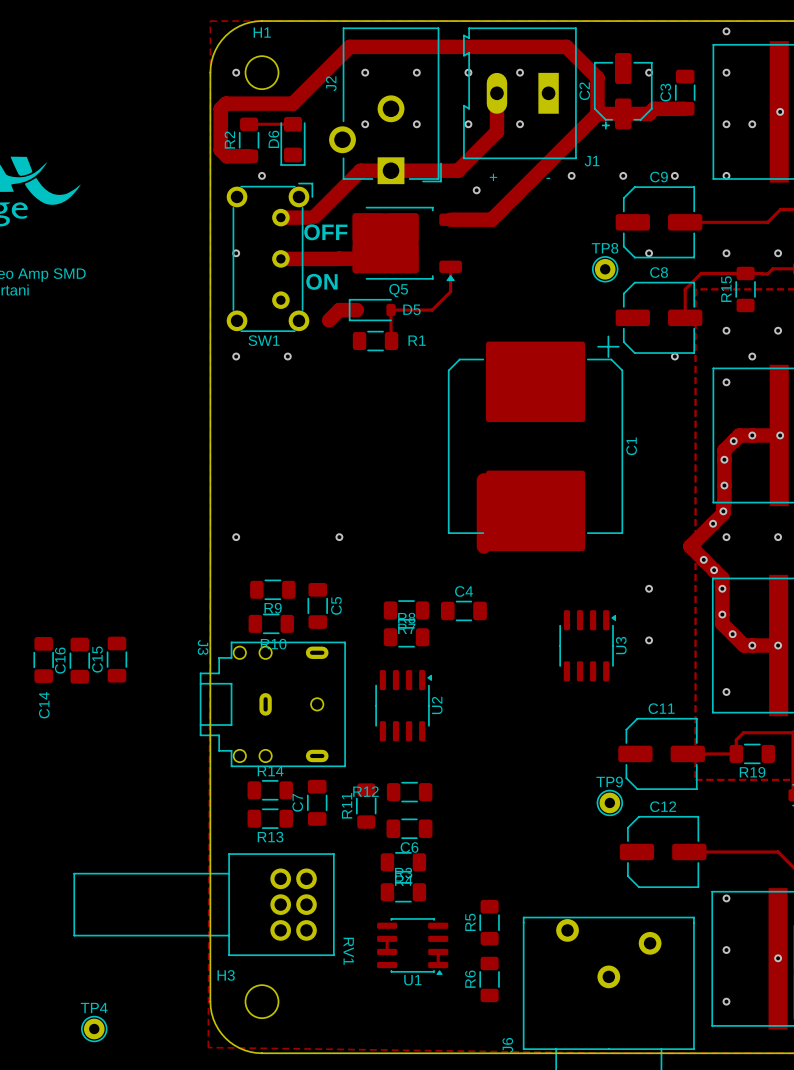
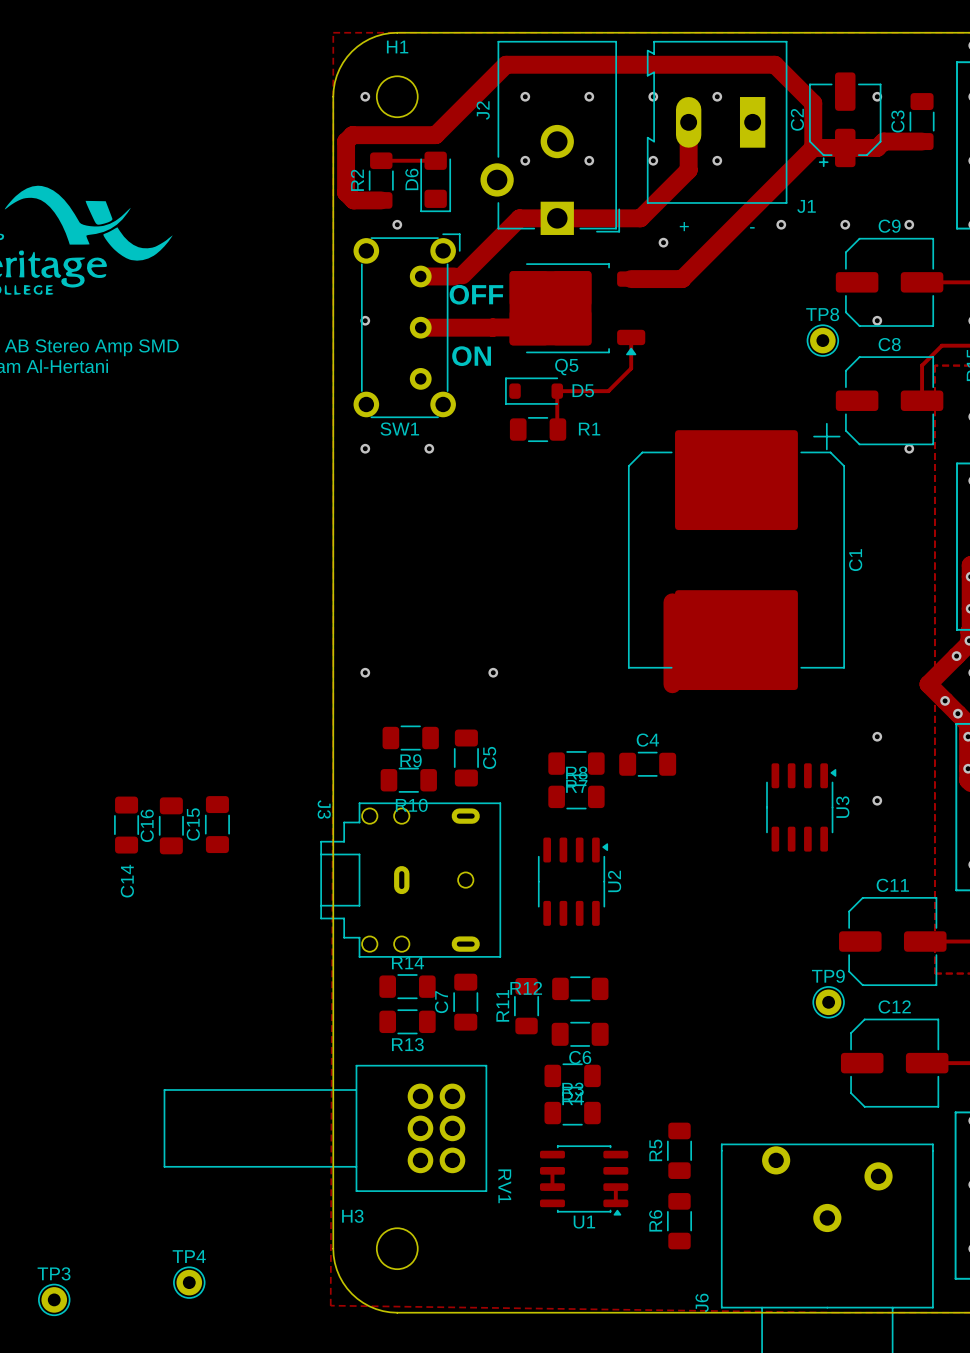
track: (356, 310) (339, 310) (329, 320) -> none

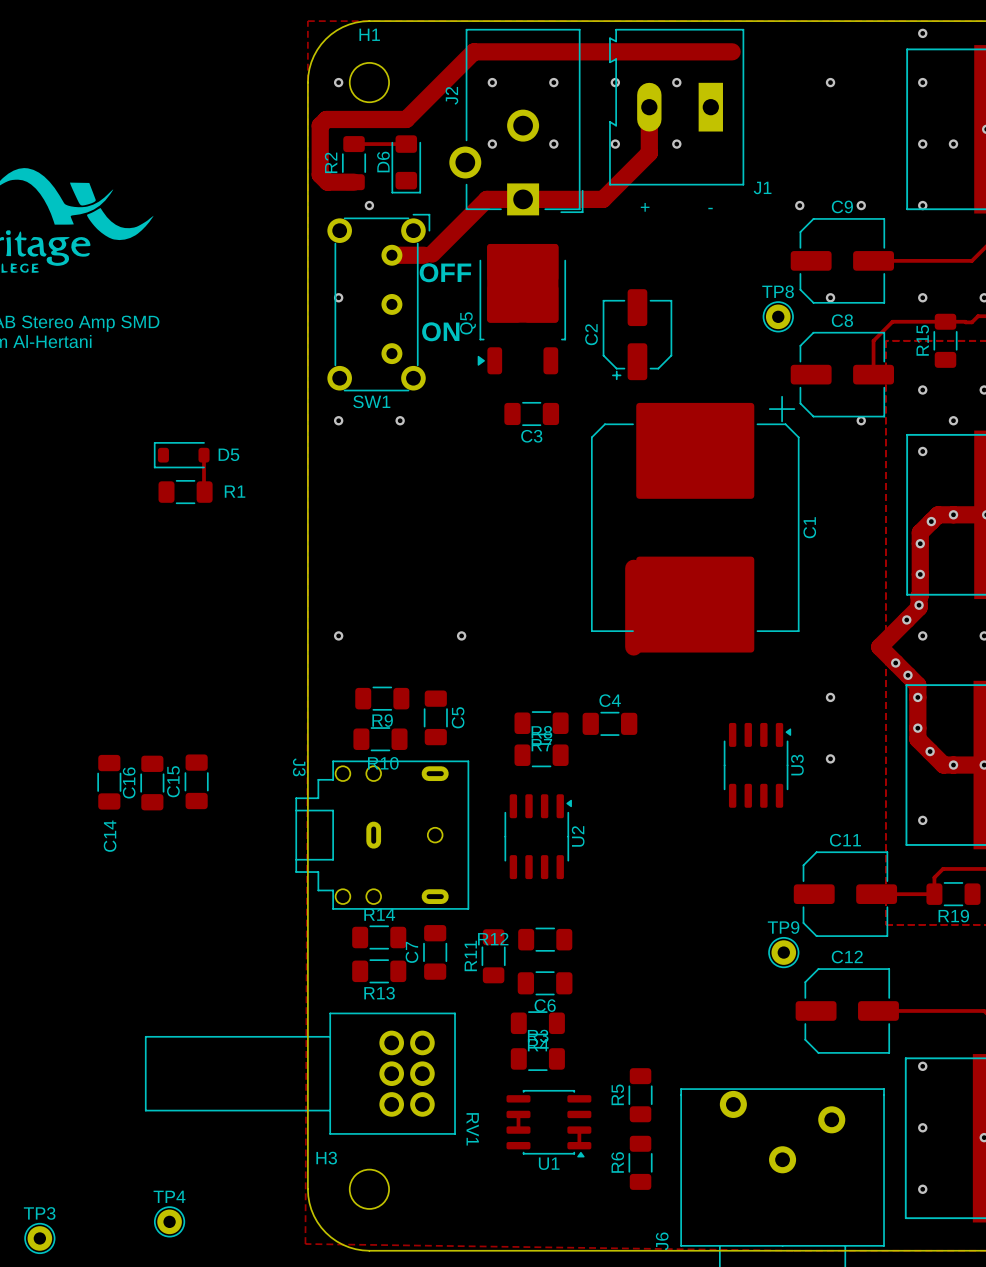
track: (774, 64) (813, 103) (813, 147) -> none
C2 position: (845, 119) -> (637, 334)
C3 name position: C3 (897, 121) -> C3 (531, 436)
C3 rotation: 0° (922, 121) -> 90° clockwise (531, 413)
C3 position: (922, 121) -> (531, 413)
track: (922, 141) (883, 141) (877, 147) (813, 147) -> none
track: (813, 147) (682, 279) (631, 279) -> none
via: (781, 224) -> none
via: (663, 242) -> none
Q5 rotation: 0° (577, 309) -> 90° clockwise (521, 309)
track: (529, 327) (420, 327) -> none
track: (631, 337) (631, 368) (608, 391) (557, 391) (557, 429) -> none
Q5 name position: Q5 (566, 367) -> Q5 (467, 323)
D5 position: (534, 391) -> (181, 455)
R1 position: (538, 429) -> (185, 492)
track: none -> (204, 455) (204, 492)

